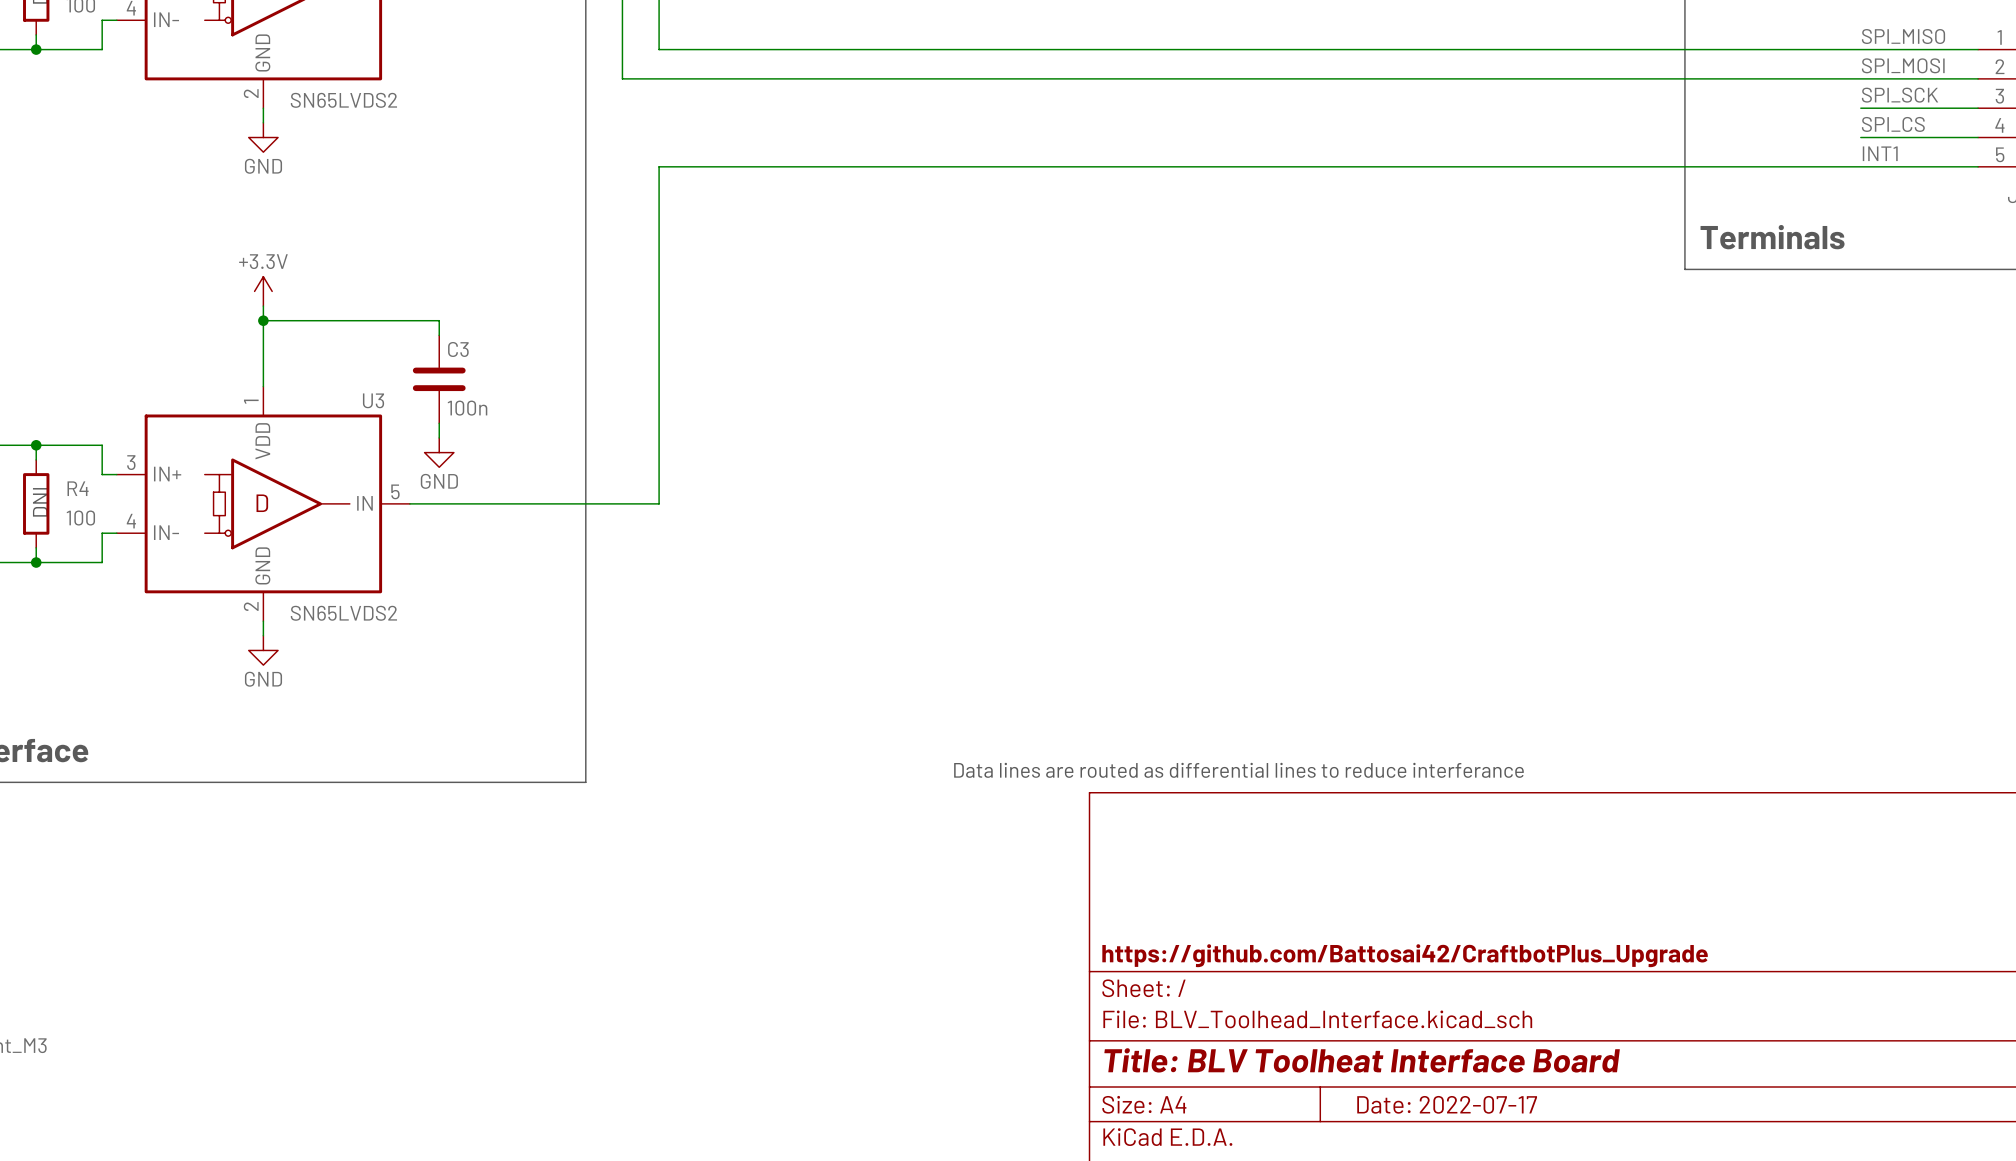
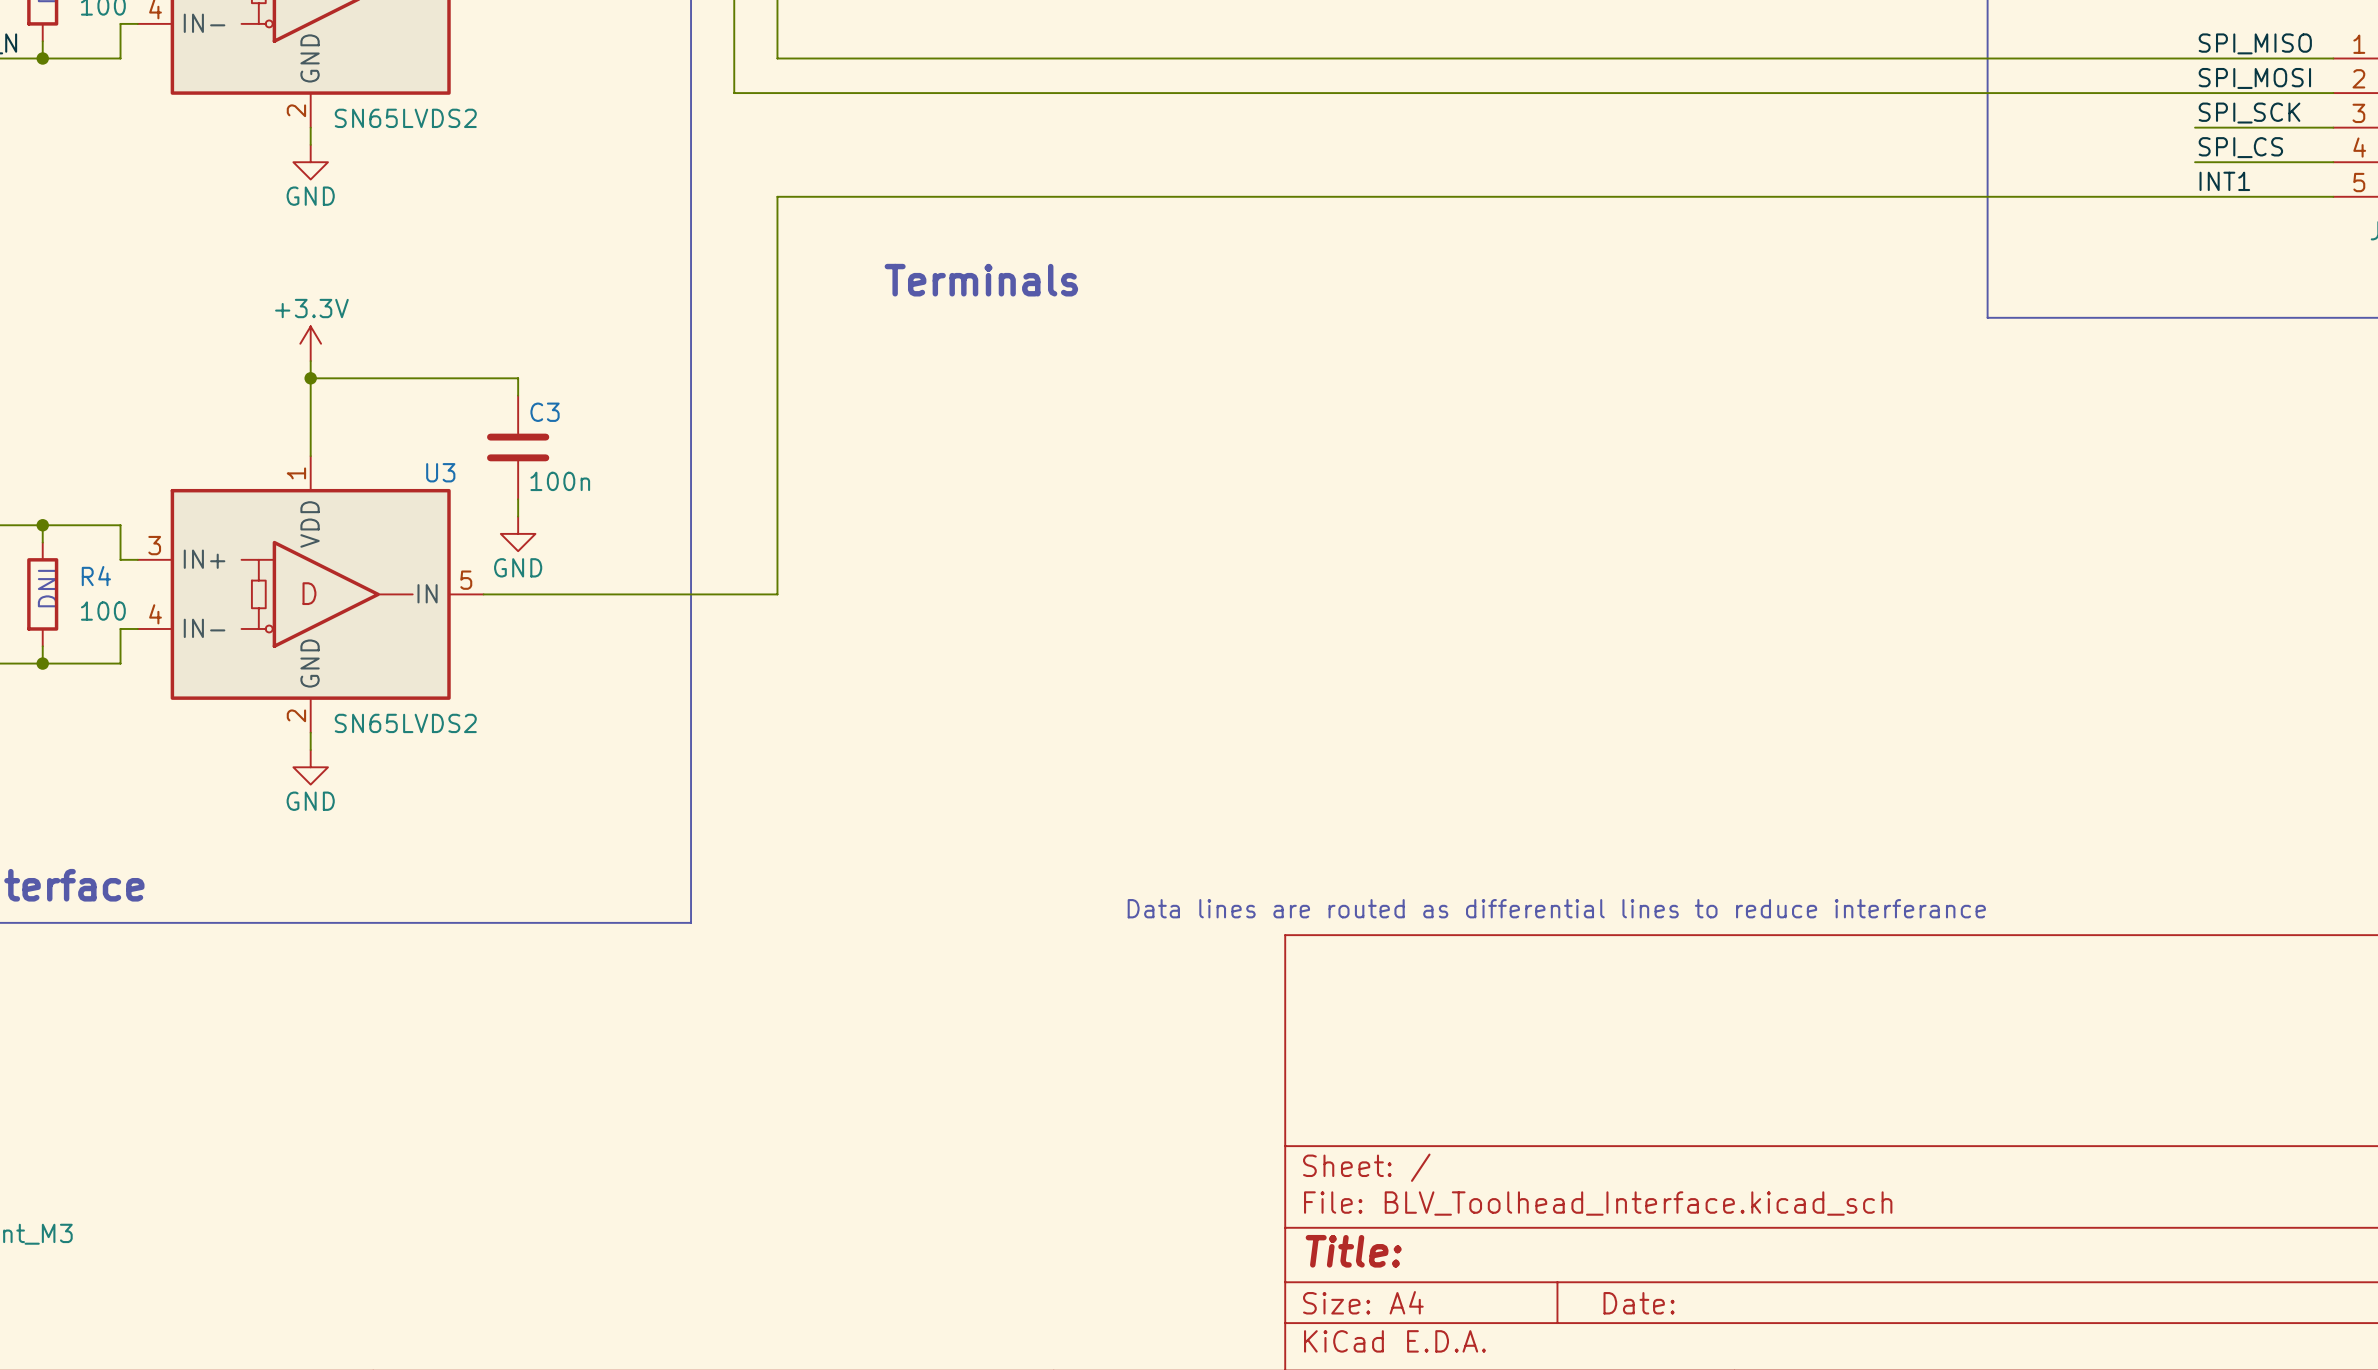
text: none -> Terminals (981, 280)
text: Terminals (1772, 237) -> none
title block: https://github.com/Battosai42/CraftbotPlus_Upgrade (1405, 955) -> none
title block: Title: BLV Toolheat Interface Board (1362, 1060) -> Title: (1353, 1251)
title block: Date: 2022-07-17 (1447, 1104) -> Date: (1639, 1303)

